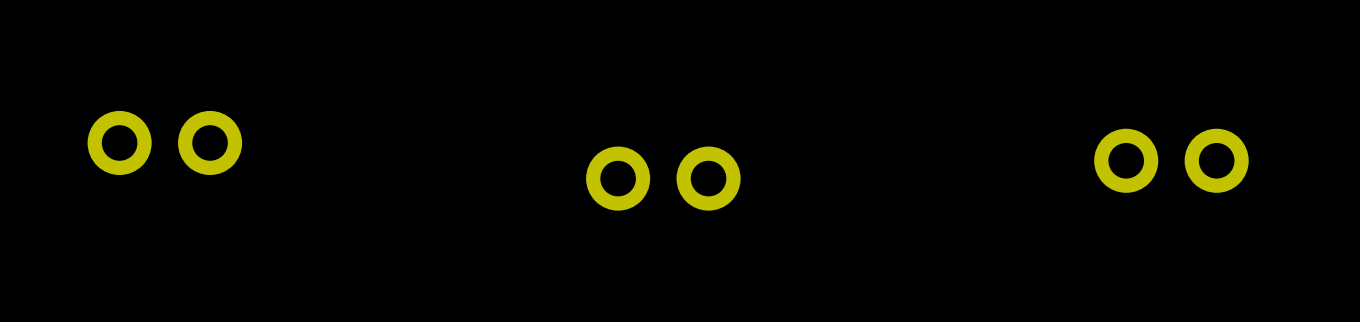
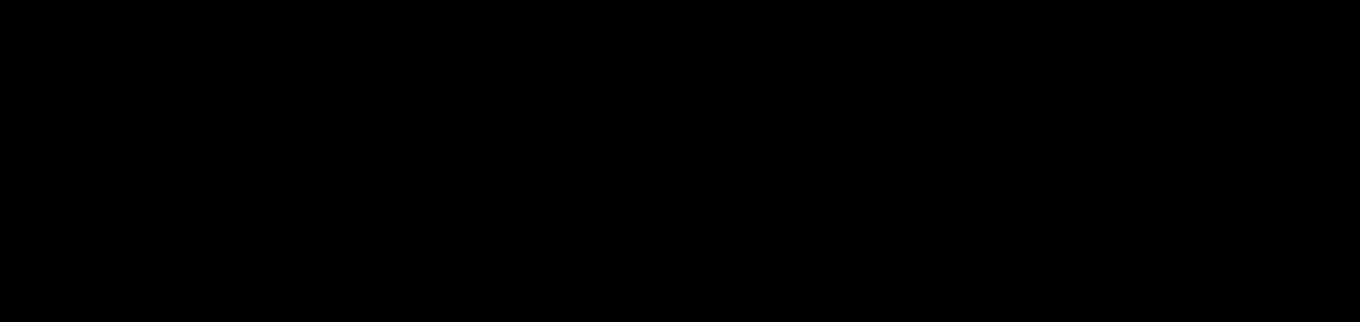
part: (164, 142) -> none
part: (1171, 160) -> none
part: (663, 178) -> none

